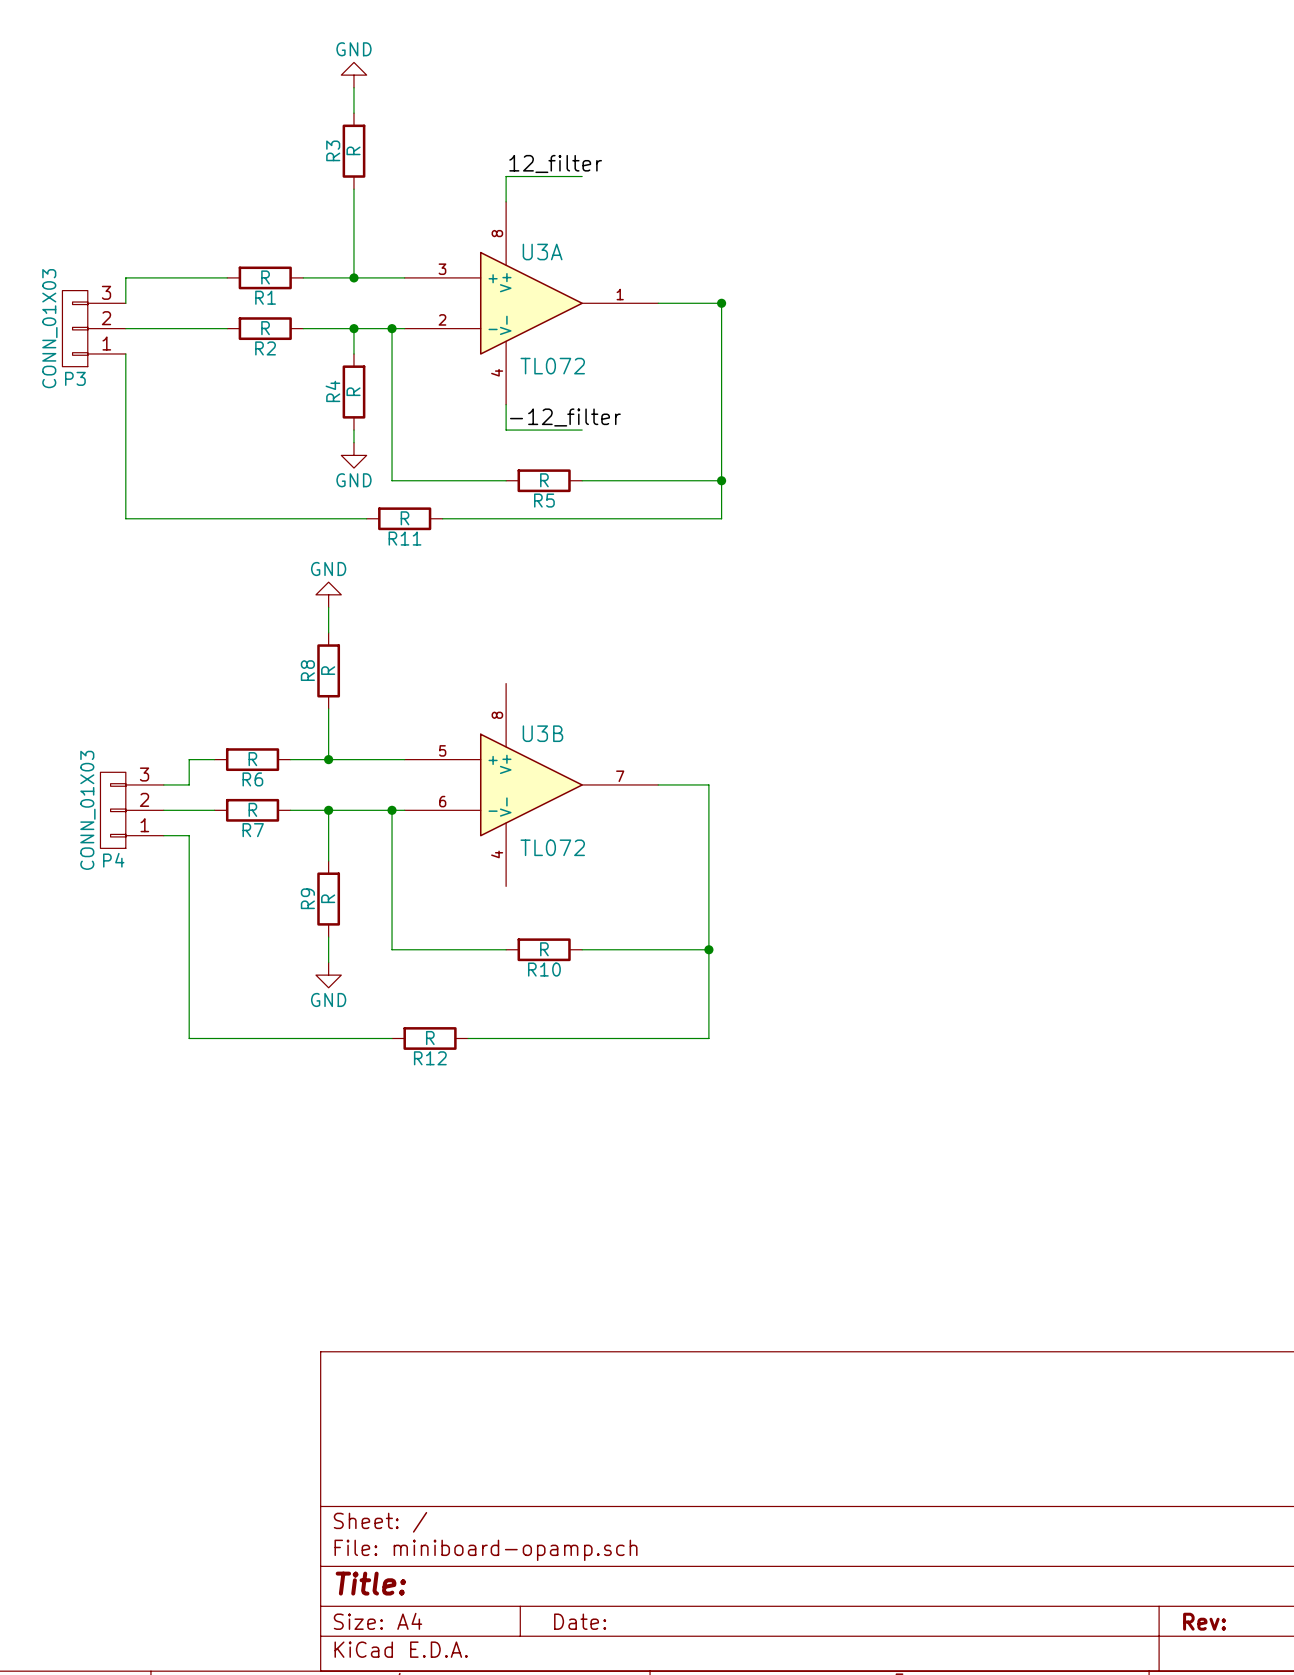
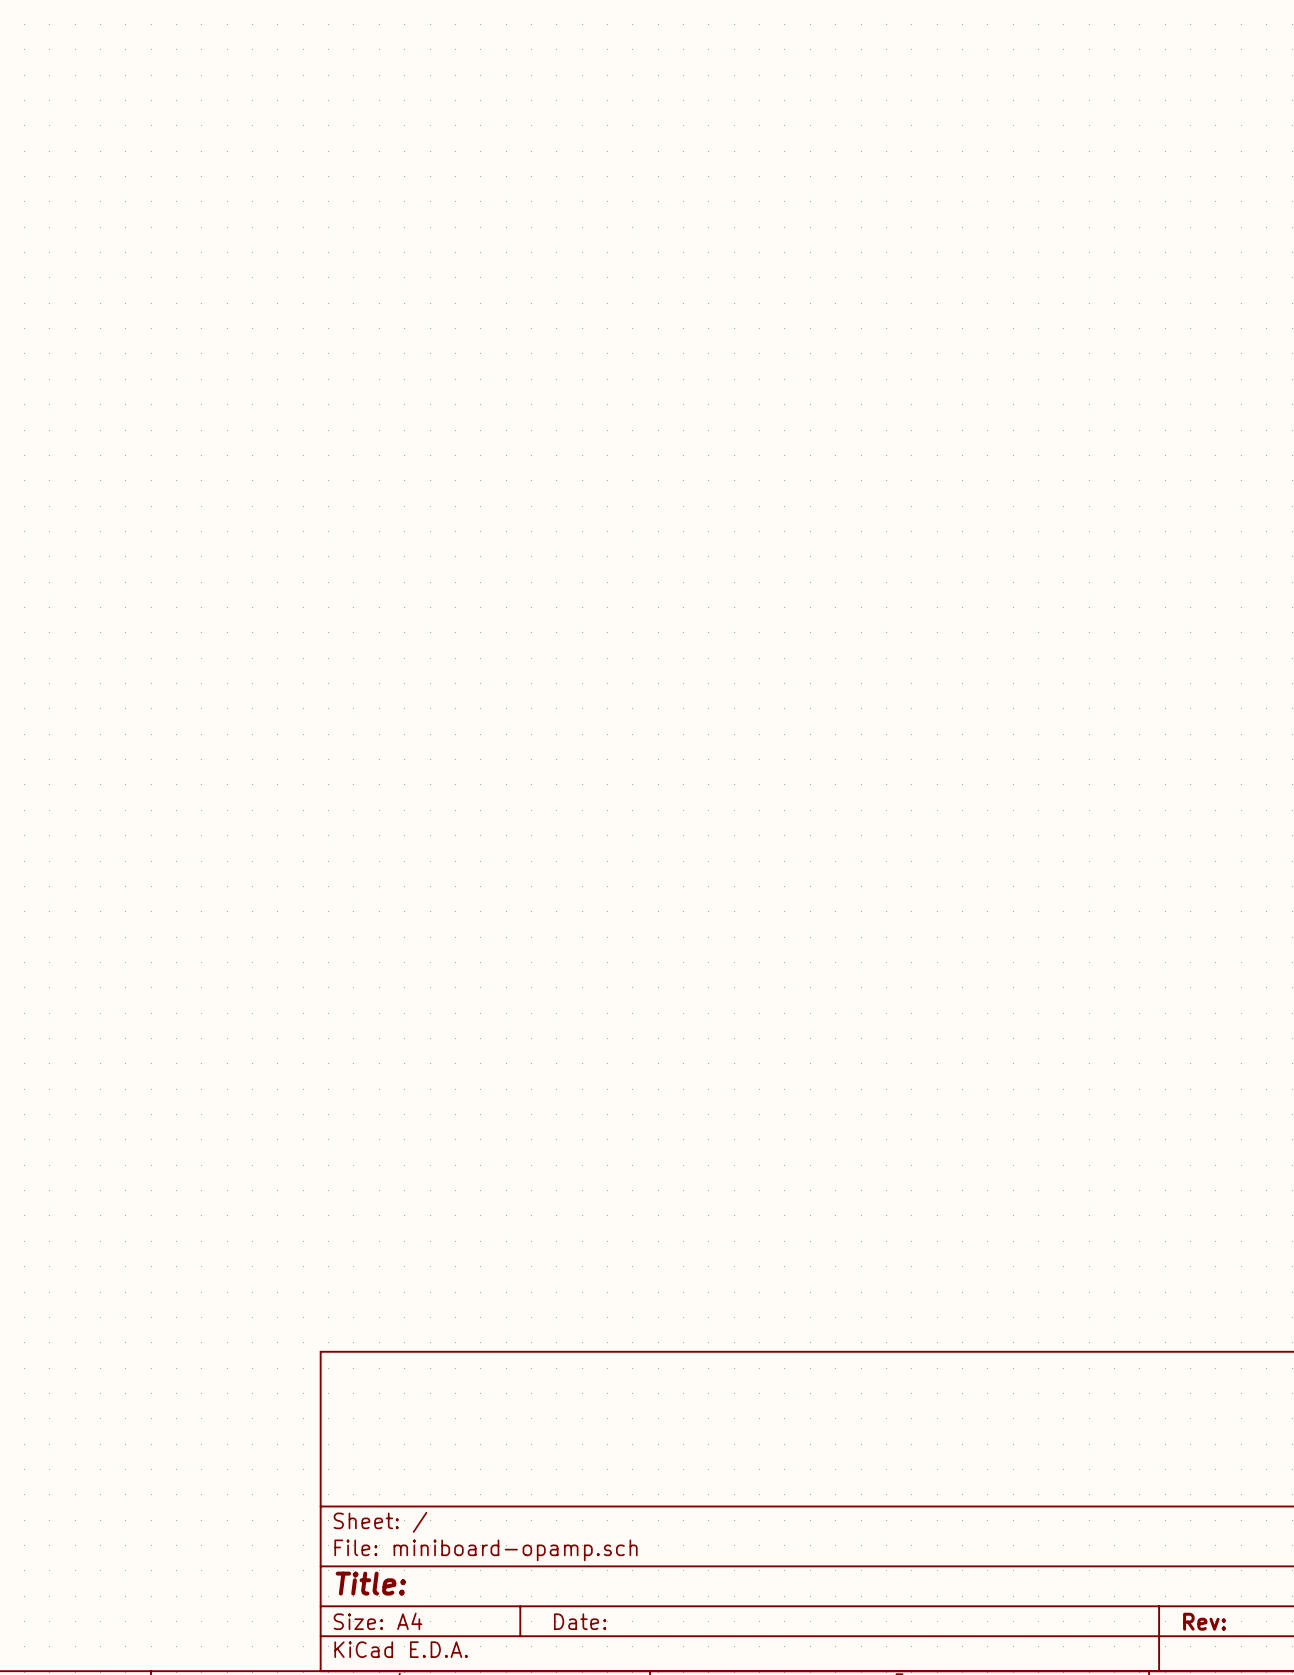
power symbol: GND (353, 75) -> none
wire: (353, 87) (353, 113) -> none
R3: R (353, 151) -> none
label: 12_filter (555, 163) -> none
wire: (582, 176) (506, 176) (506, 201) -> none
wire: (353, 189) (353, 277) -> none
wire: (227, 277) (125, 277) (125, 303) -> none
R1: R (265, 277) -> none
wire: (303, 277) (404, 277) -> none
junction: (353, 277) -> none
U3A: TL072 (531, 303) -> none
wire: (658, 303) (721, 303) (721, 518) (442, 518) -> none
junction: (721, 303) -> none
P3: CONN_01X03 (94, 328) -> none
wire: (125, 328) (227, 328) -> none
R2: R (265, 328) -> none
wire: (303, 328) (404, 328) -> none
wire: (353, 328) (353, 353) -> none
junction: (353, 328) -> none
wire: (392, 328) (392, 480) (506, 480) -> none
junction: (392, 328) -> none
wire: (125, 353) (125, 518) (366, 518) -> none
R4: R (353, 392) -> none
wire: (506, 404) (506, 430) (582, 430) -> none
label: -12_filter (565, 417) -> none
wire: (353, 430) (353, 442) -> none
power symbol: GND (353, 455) -> none
R5: R (544, 480) -> none
wire: (582, 480) (721, 480) -> none
junction: (721, 480) -> none
R11: R (404, 518) -> none
power symbol: GND (328, 594) -> none
wire: (328, 607) (328, 632) -> none
R8: R (328, 670) -> none
wire: (328, 708) (328, 759) -> none
wire: (214, 759) (189, 759) (189, 784) (163, 784) -> none
R6: R (252, 759) -> none
wire: (290, 759) (404, 759) -> none
junction: (328, 759) -> none
U3B: TL072 (531, 784) -> none
wire: (658, 784) (708, 784) (708, 1038) (468, 1038) -> none
P4: CONN_01X03 (132, 810) -> none
wire: (163, 810) (214, 810) -> none
R7: R (252, 810) -> none
wire: (290, 810) (404, 810) -> none
wire: (328, 810) (328, 861) -> none
junction: (328, 810) -> none
wire: (392, 810) (392, 949) (506, 949) -> none
junction: (392, 810) -> none
wire: (163, 835) (189, 835) (189, 1038) (392, 1038) -> none
R9: R (328, 899) -> none
wire: (328, 937) (328, 962) -> none
R10: R (544, 949) -> none
wire: (582, 949) (708, 949) -> none
junction: (708, 949) -> none
power symbol: GND (328, 975) -> none
R12: R (430, 1038) -> none

